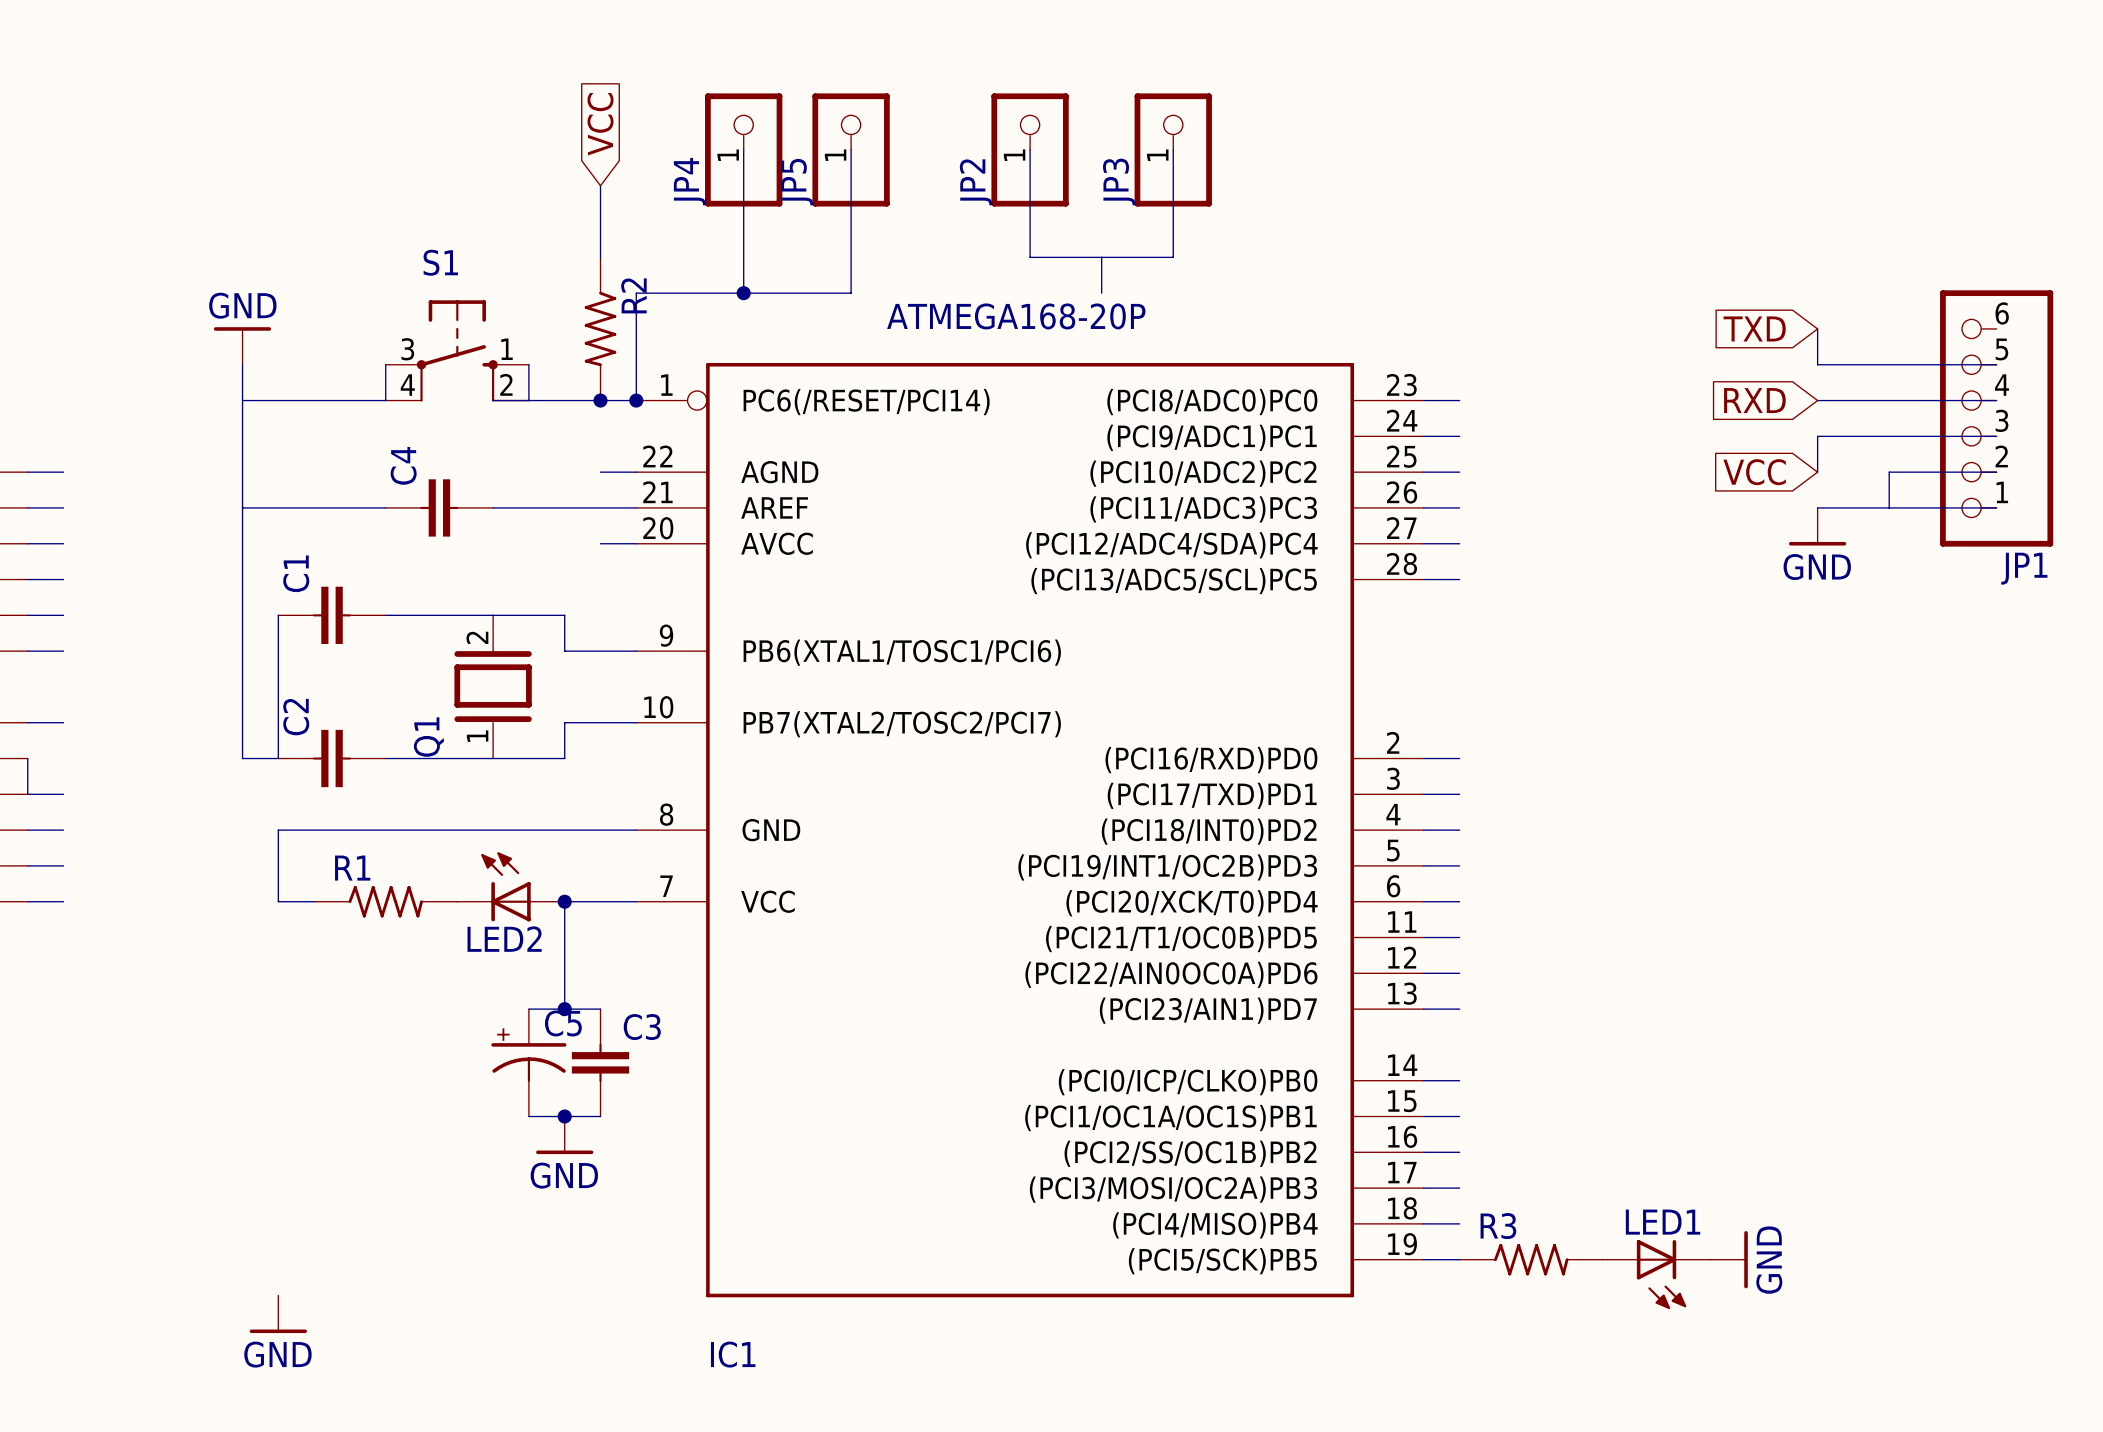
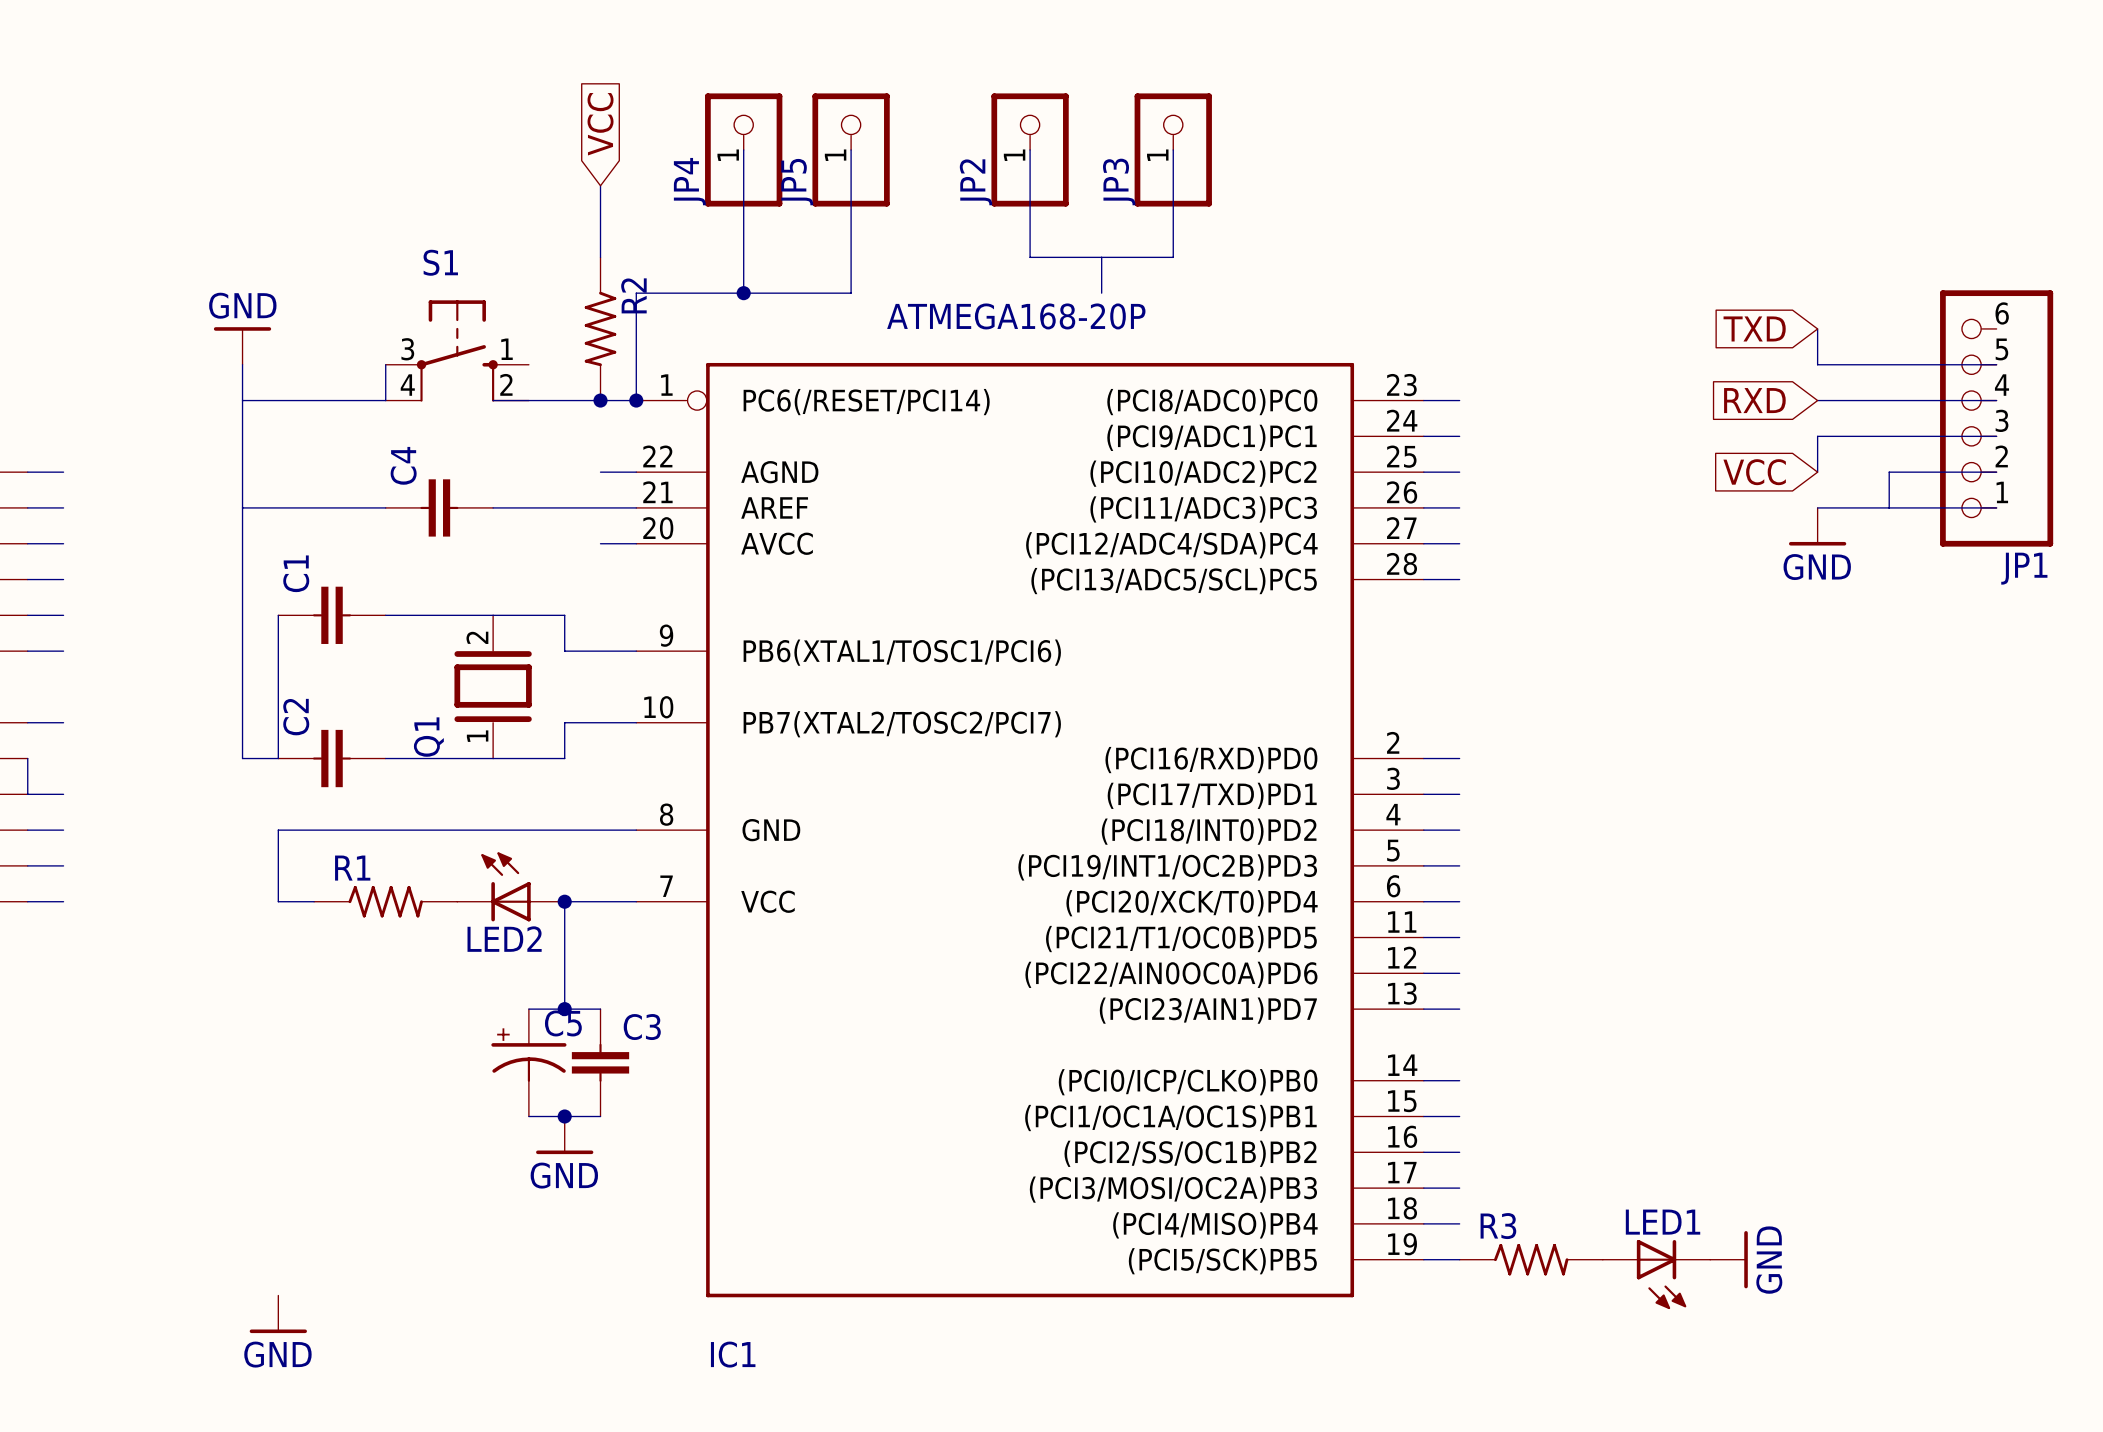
wire: (528, 364) (528, 400) -> none

